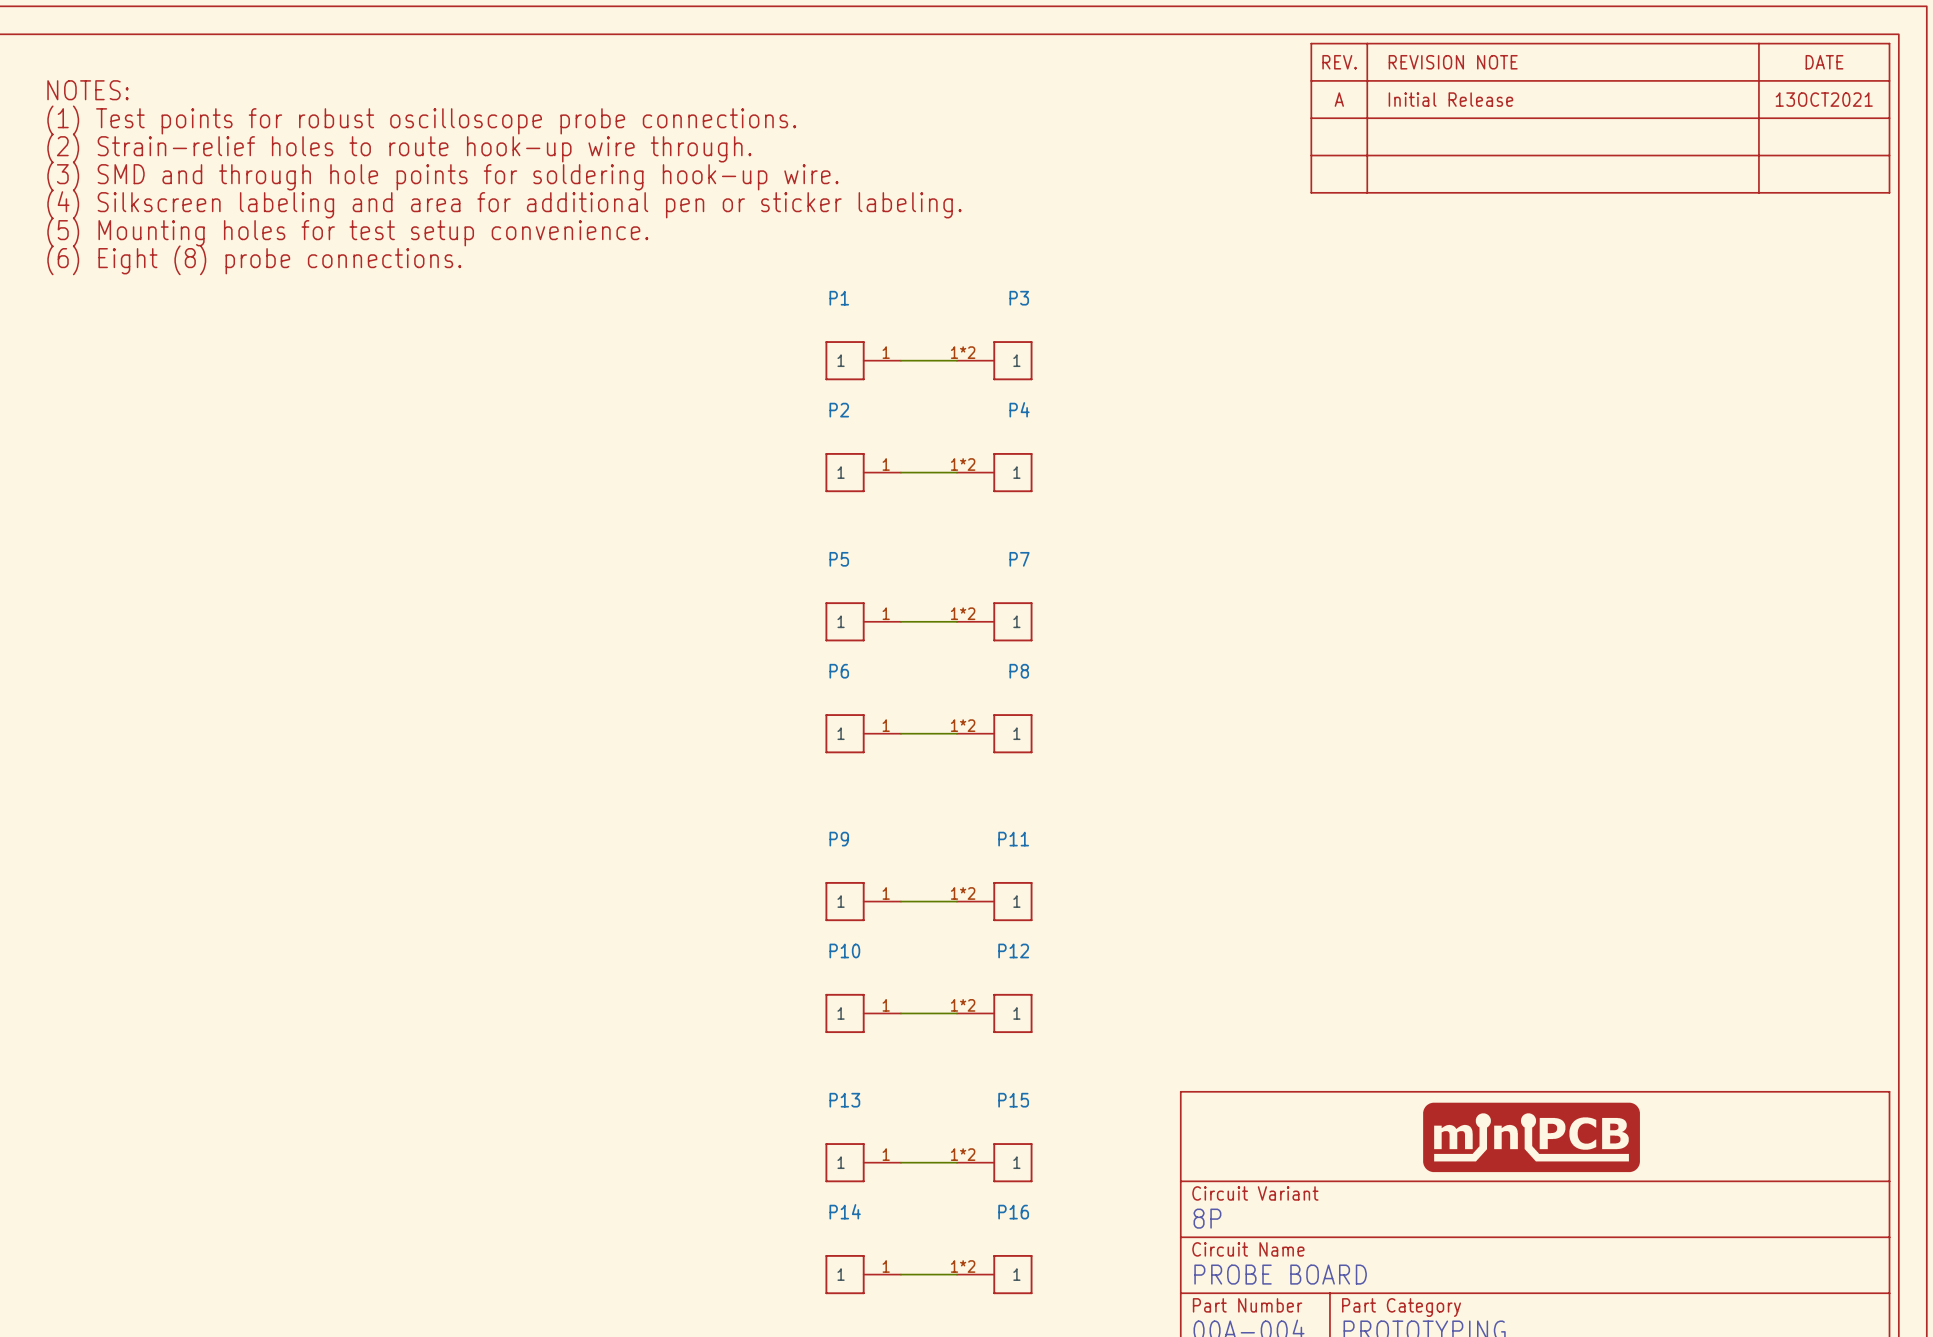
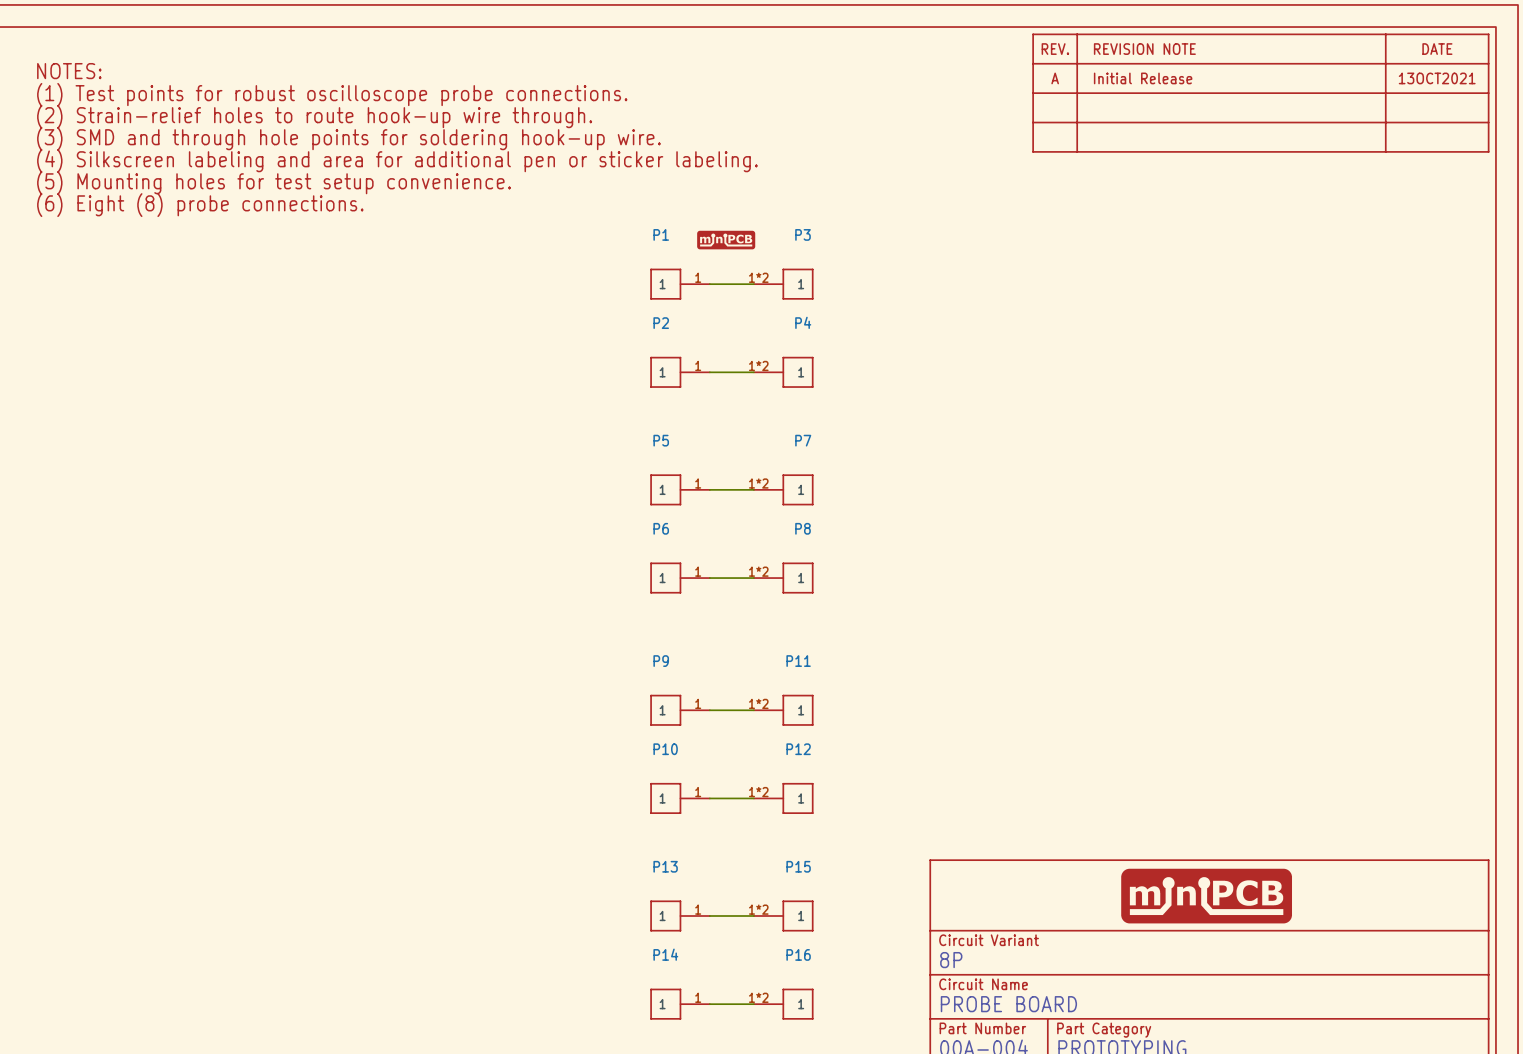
part: none -> (726, 240)

